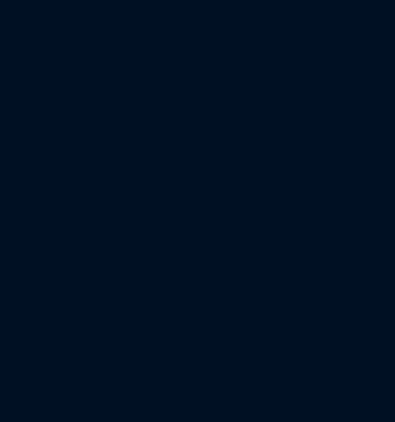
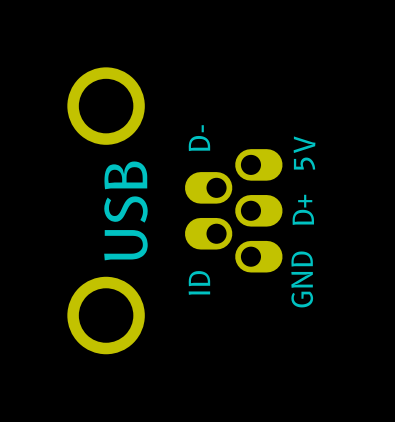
part: none -> (174, 210)

